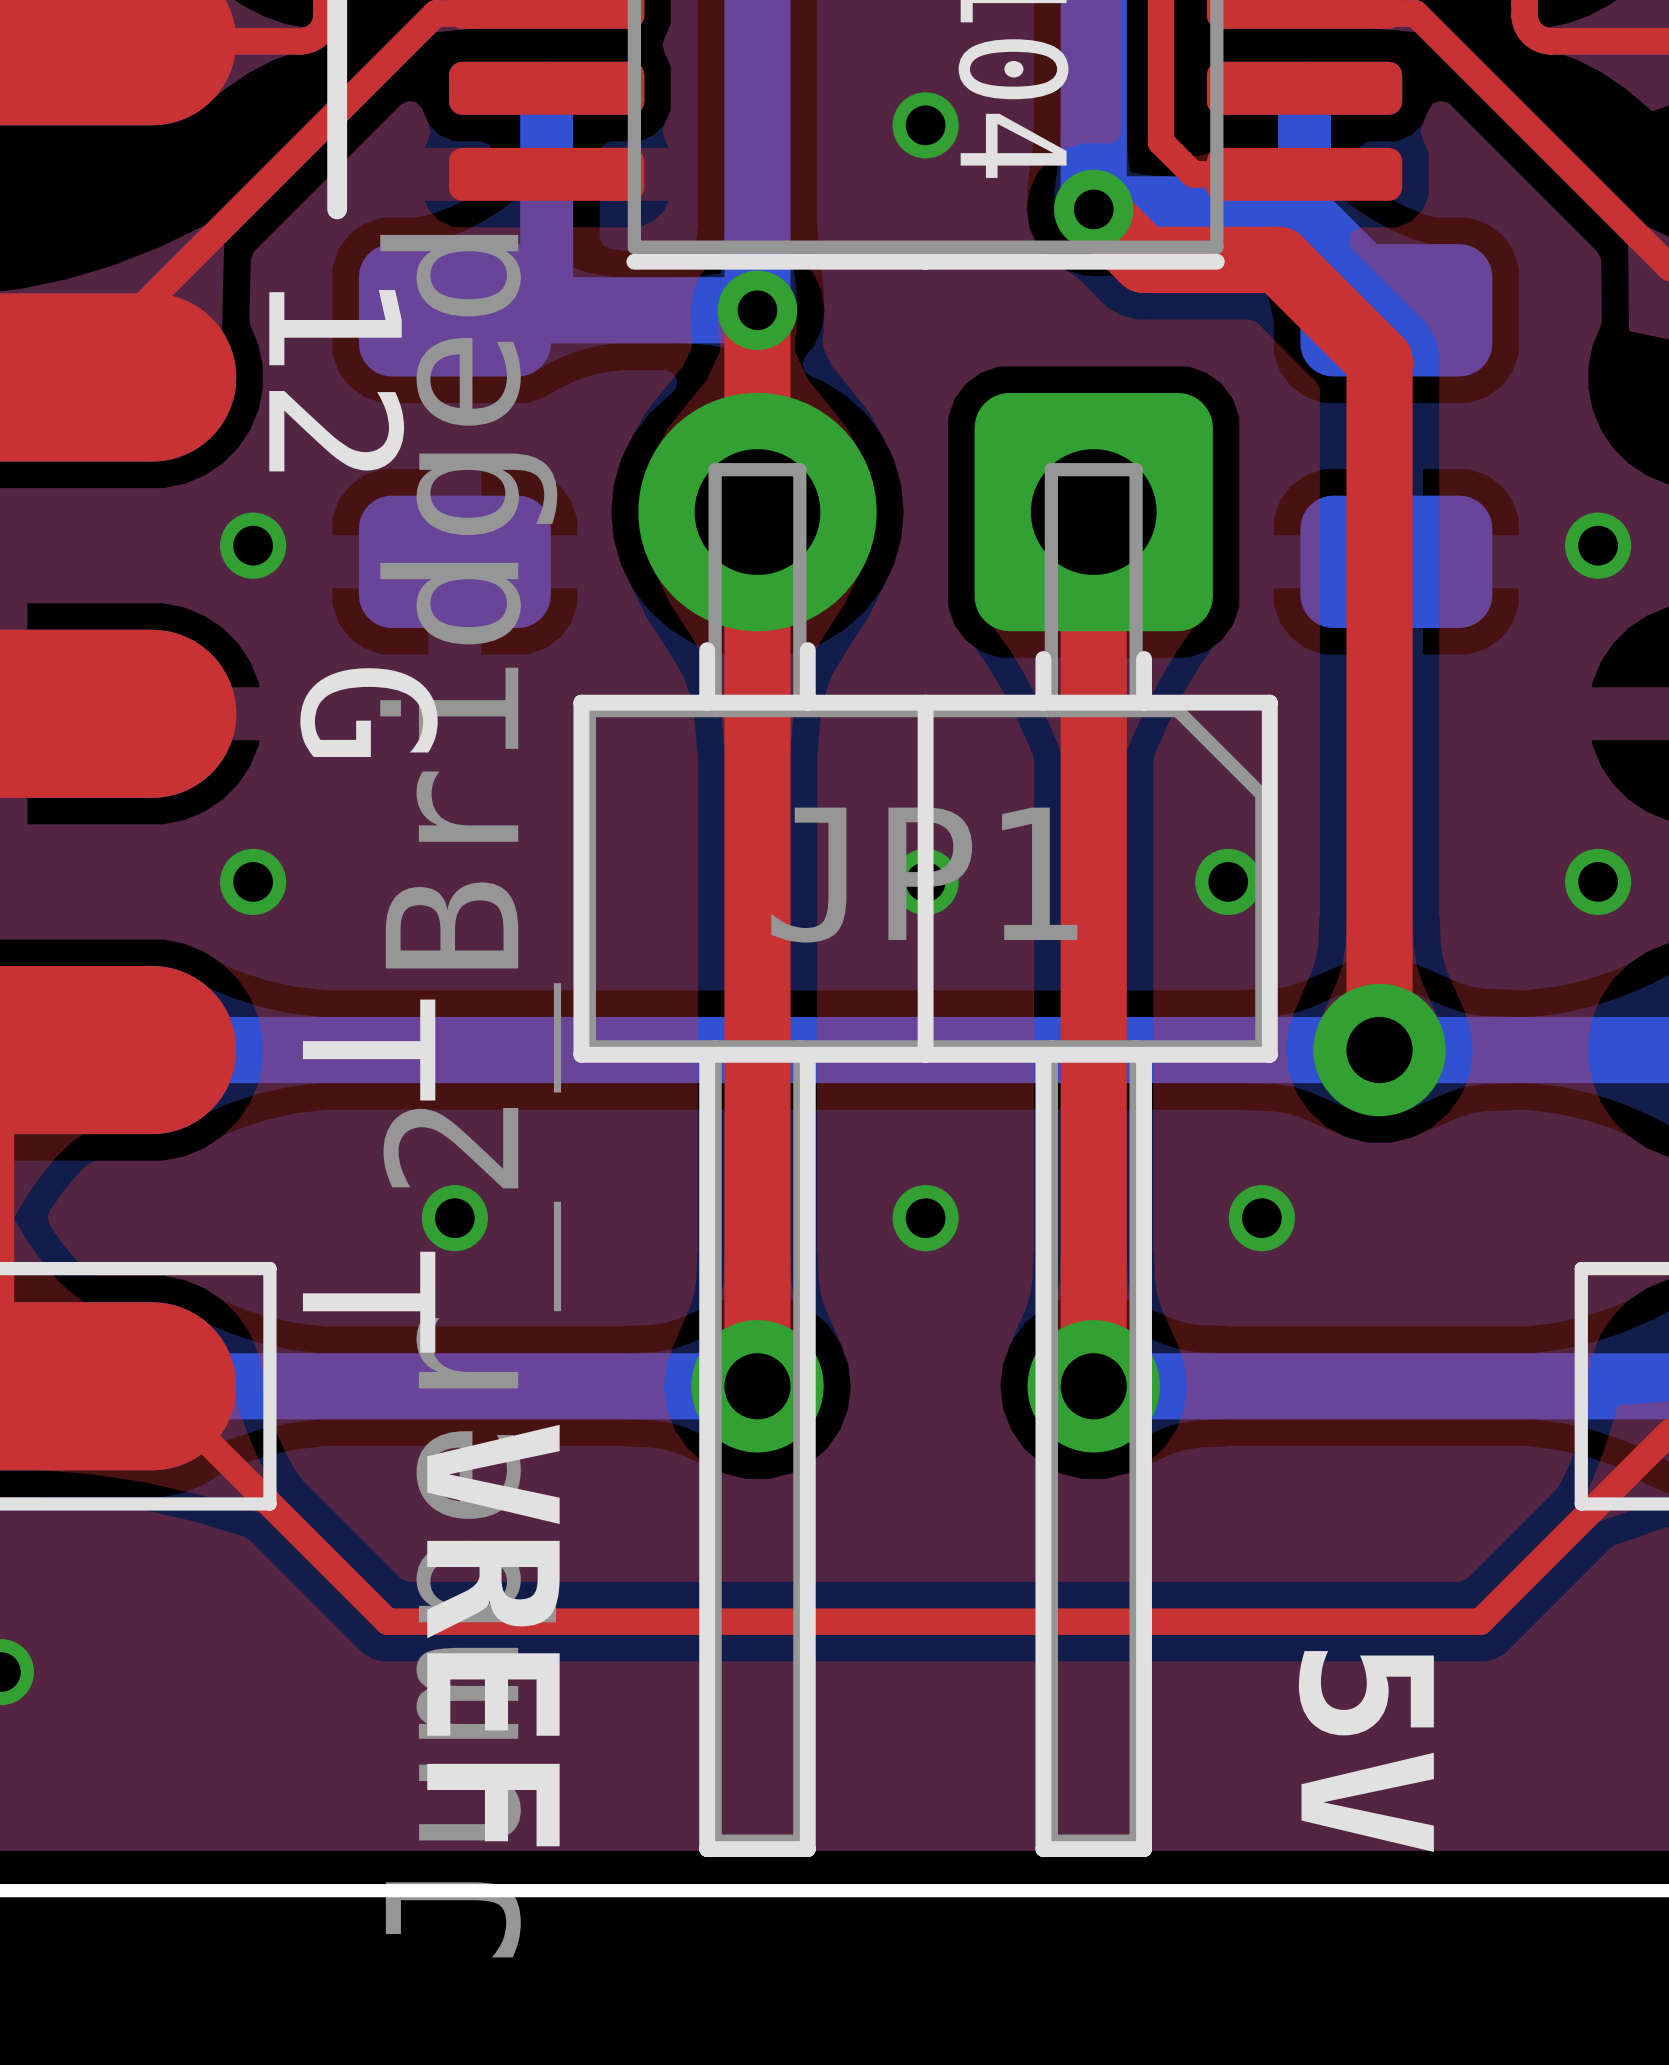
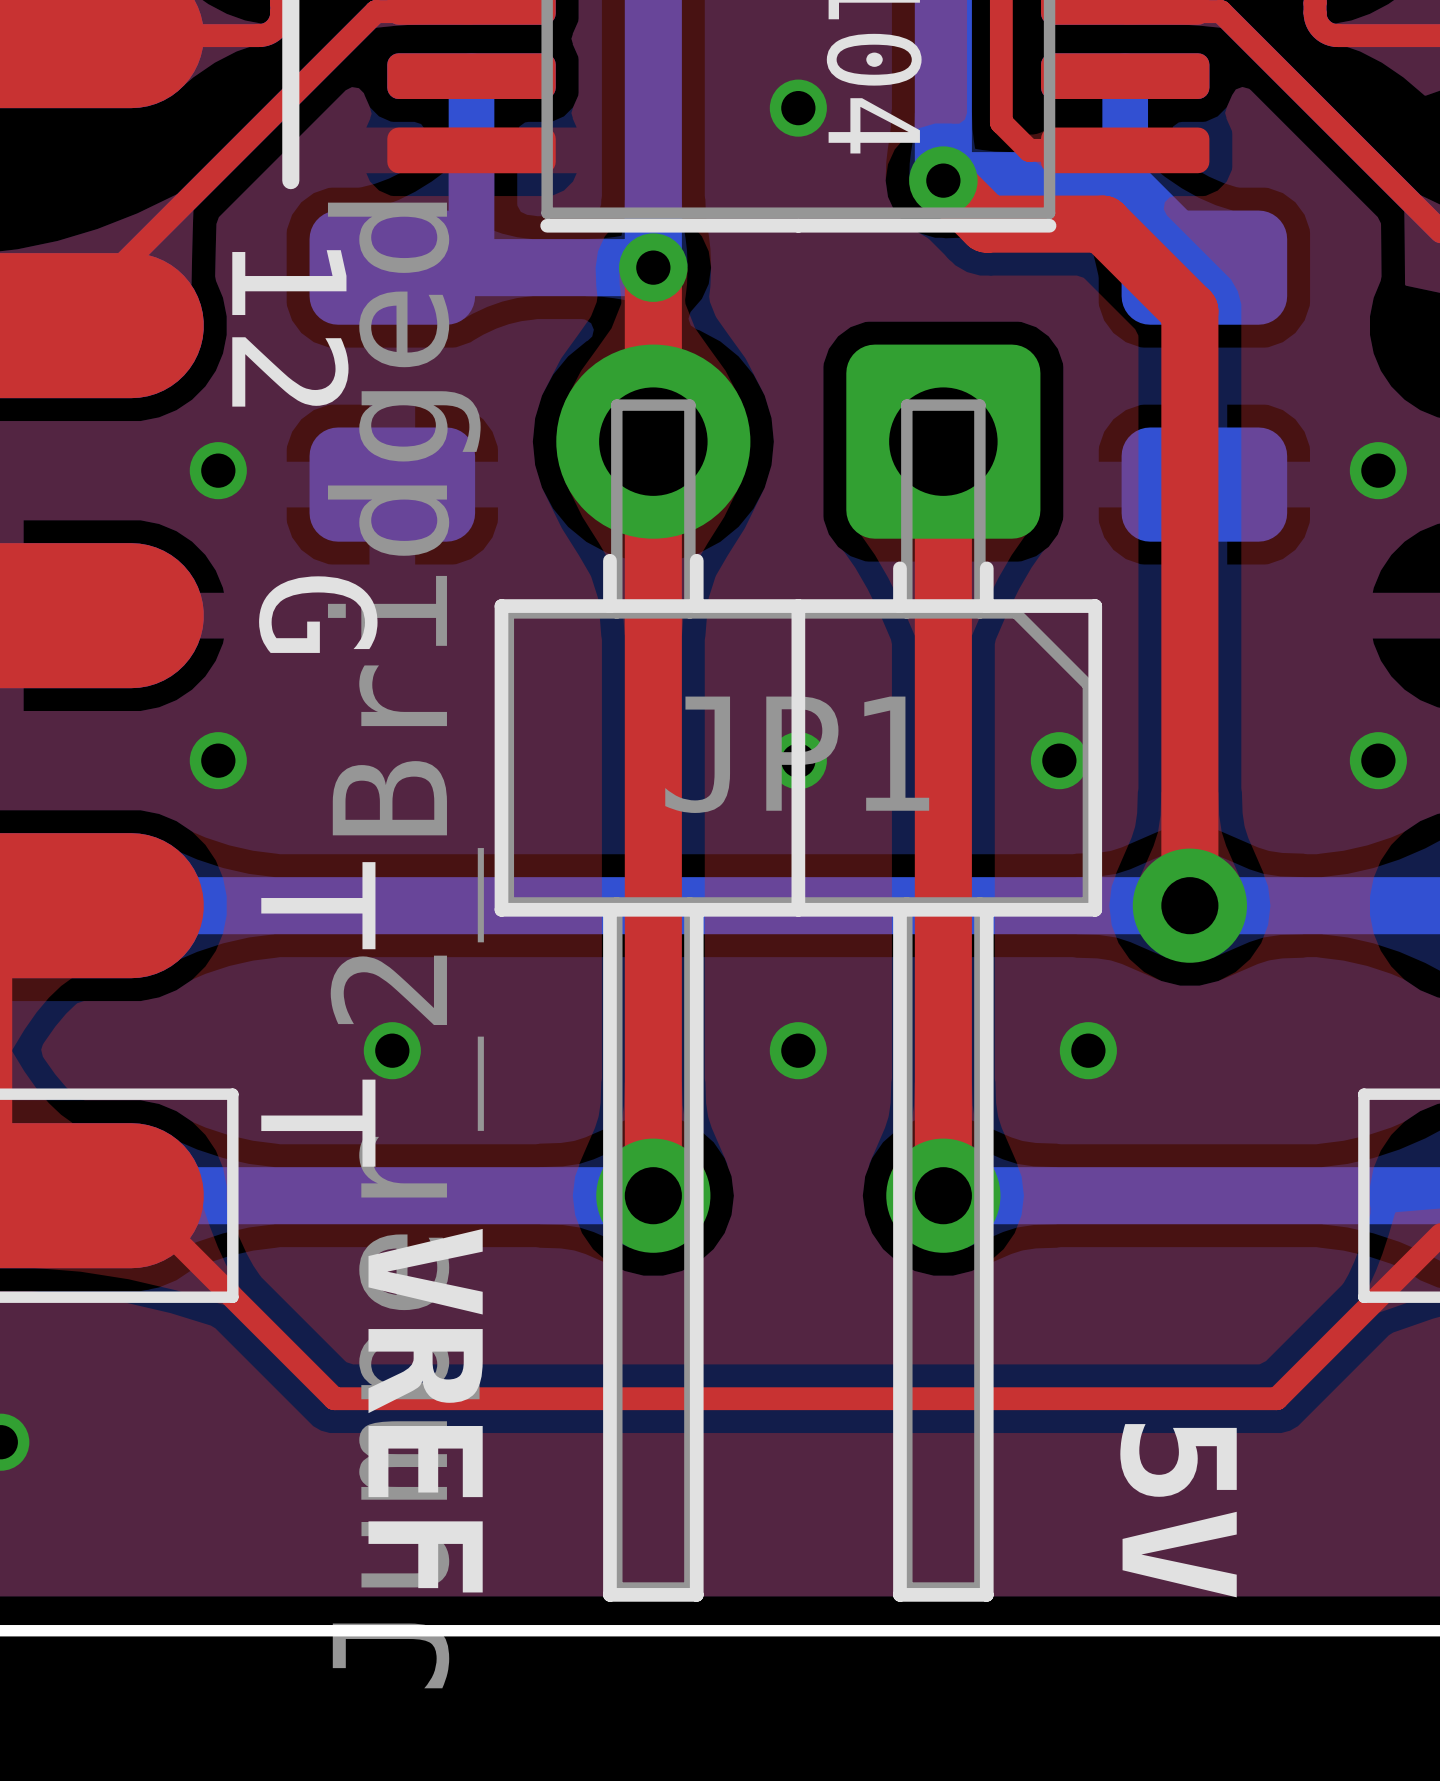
JP1 footprint: [573, 392, 1278, 1858] -> [494, 344, 1103, 1602]

